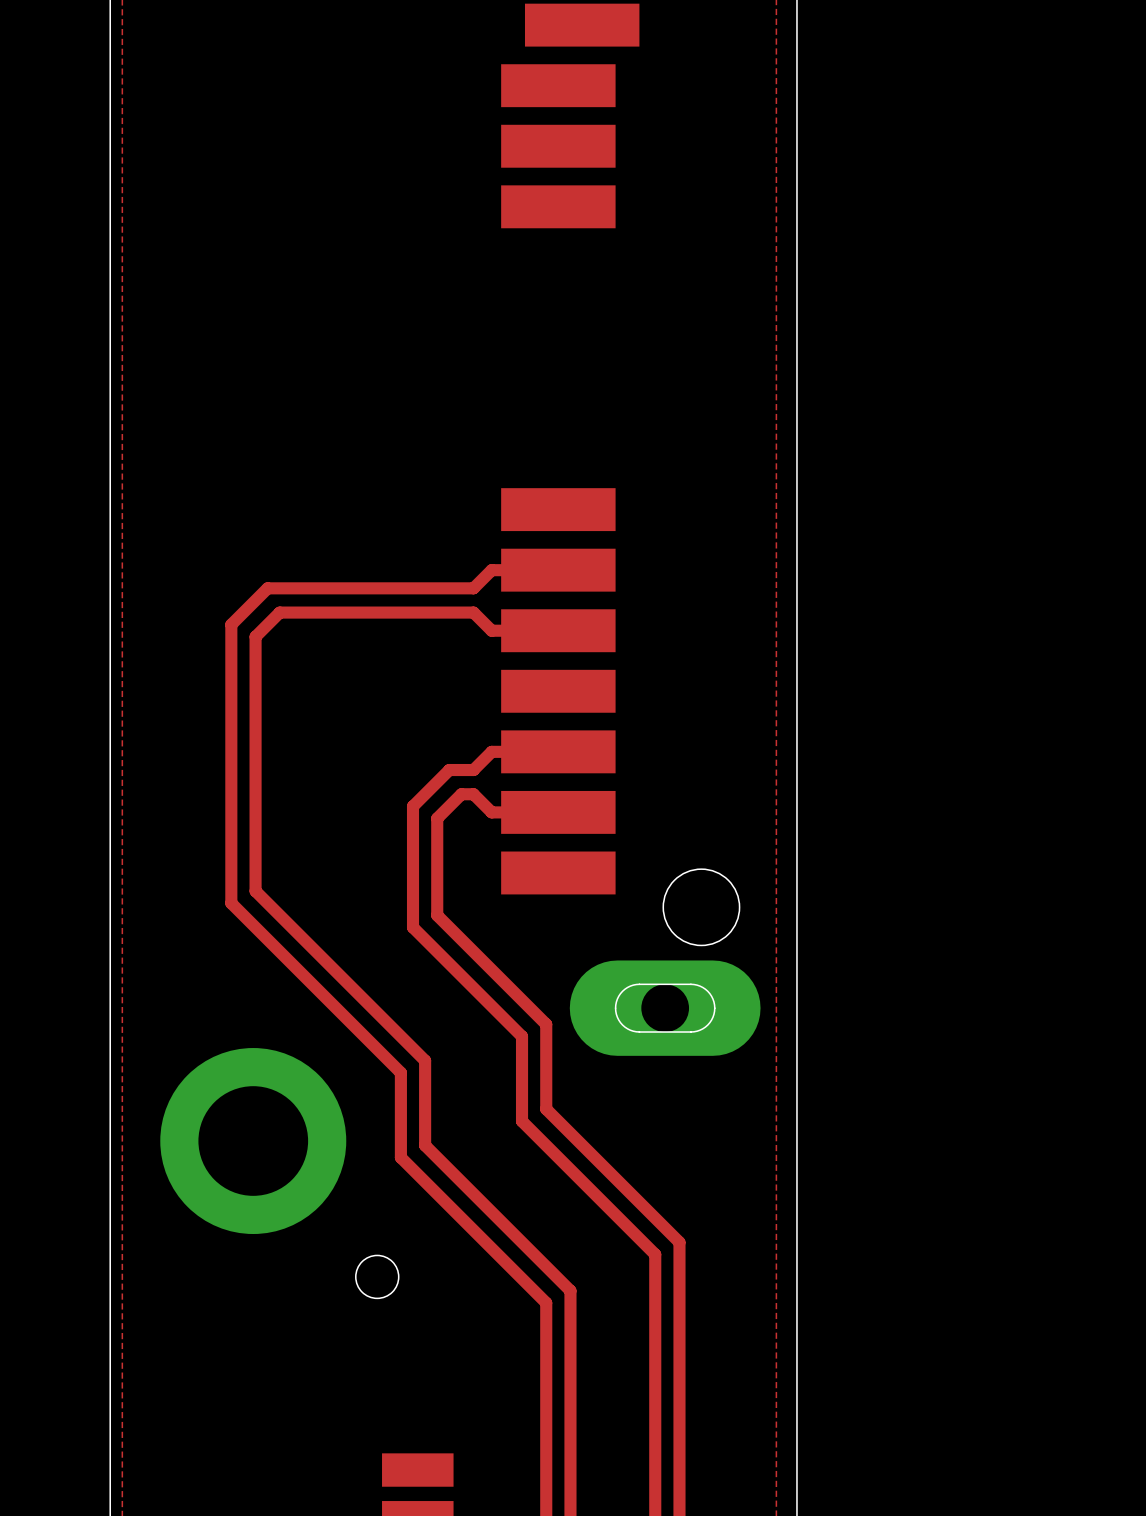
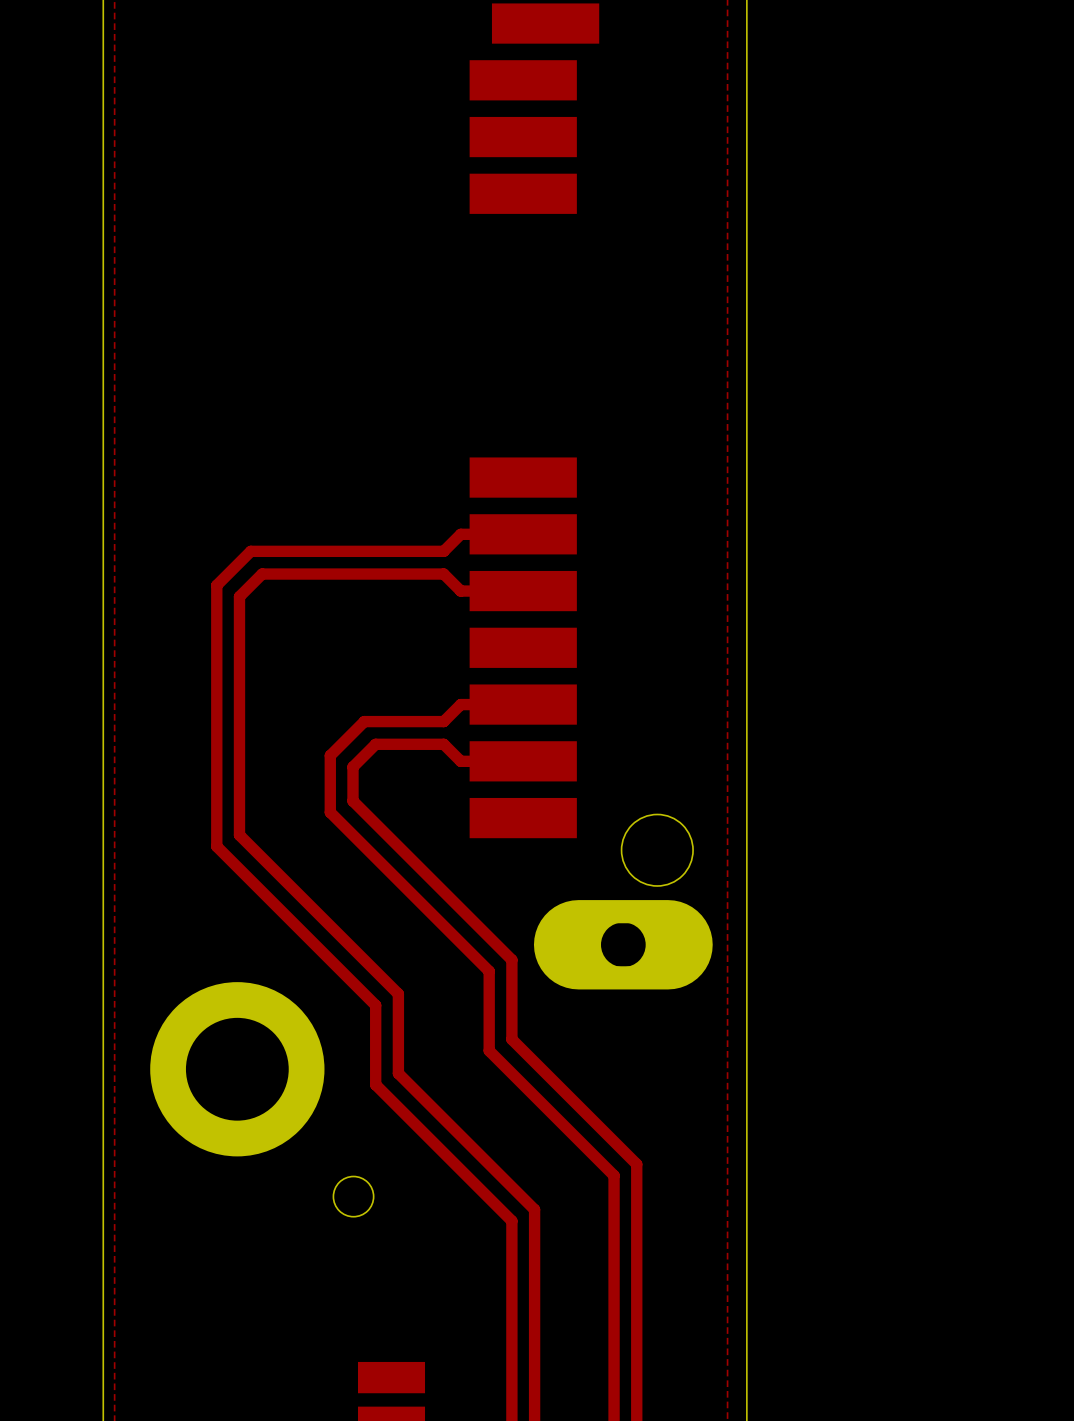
track: (449, 770) (413, 806) (413, 927) -> (421, 721) (364, 721) (330, 755) (330, 812) (387, 869)
track: (461, 794) (437, 818) (437, 915) -> (432, 744) (375, 744) (352, 767) (352, 801) (409, 857)

